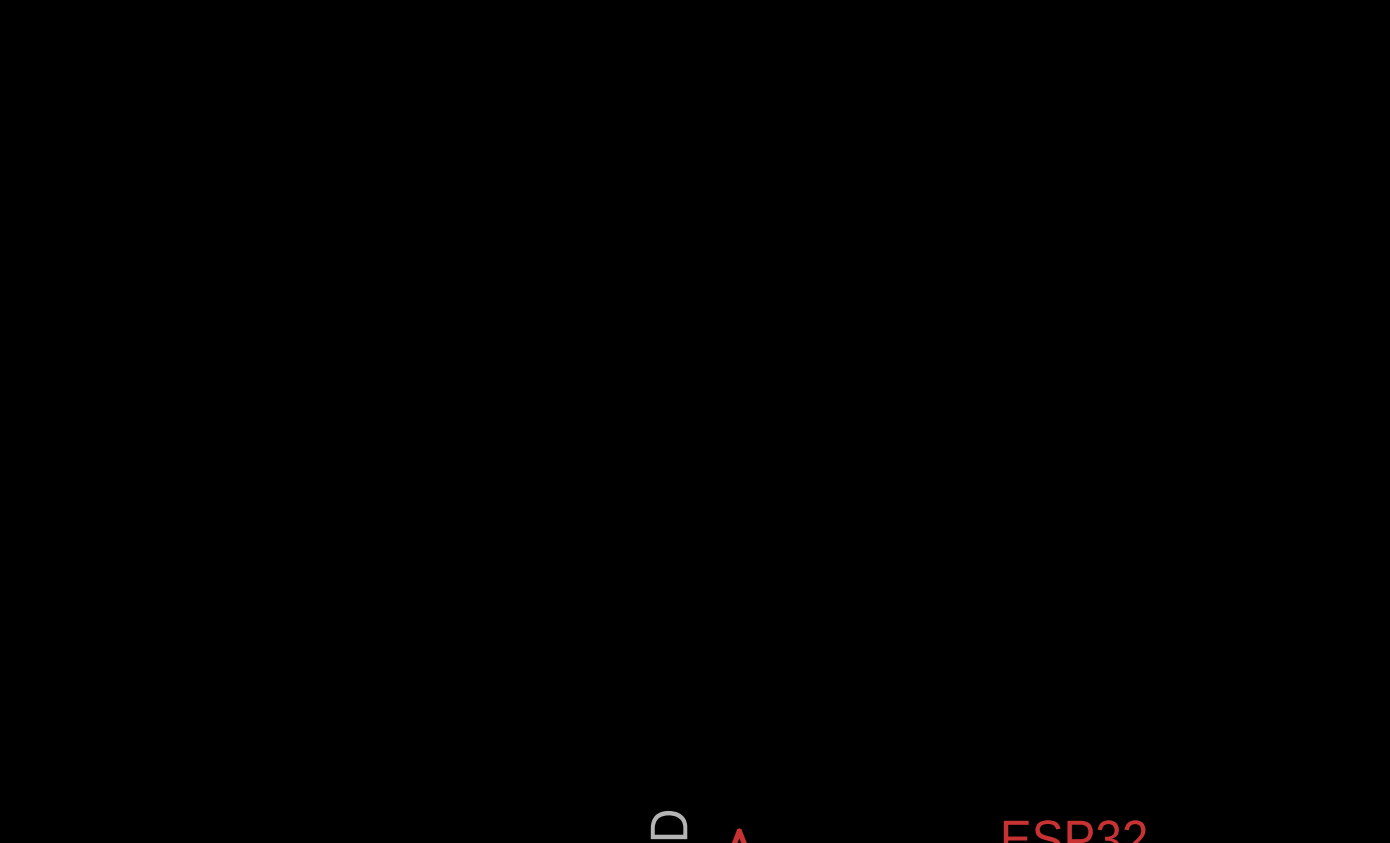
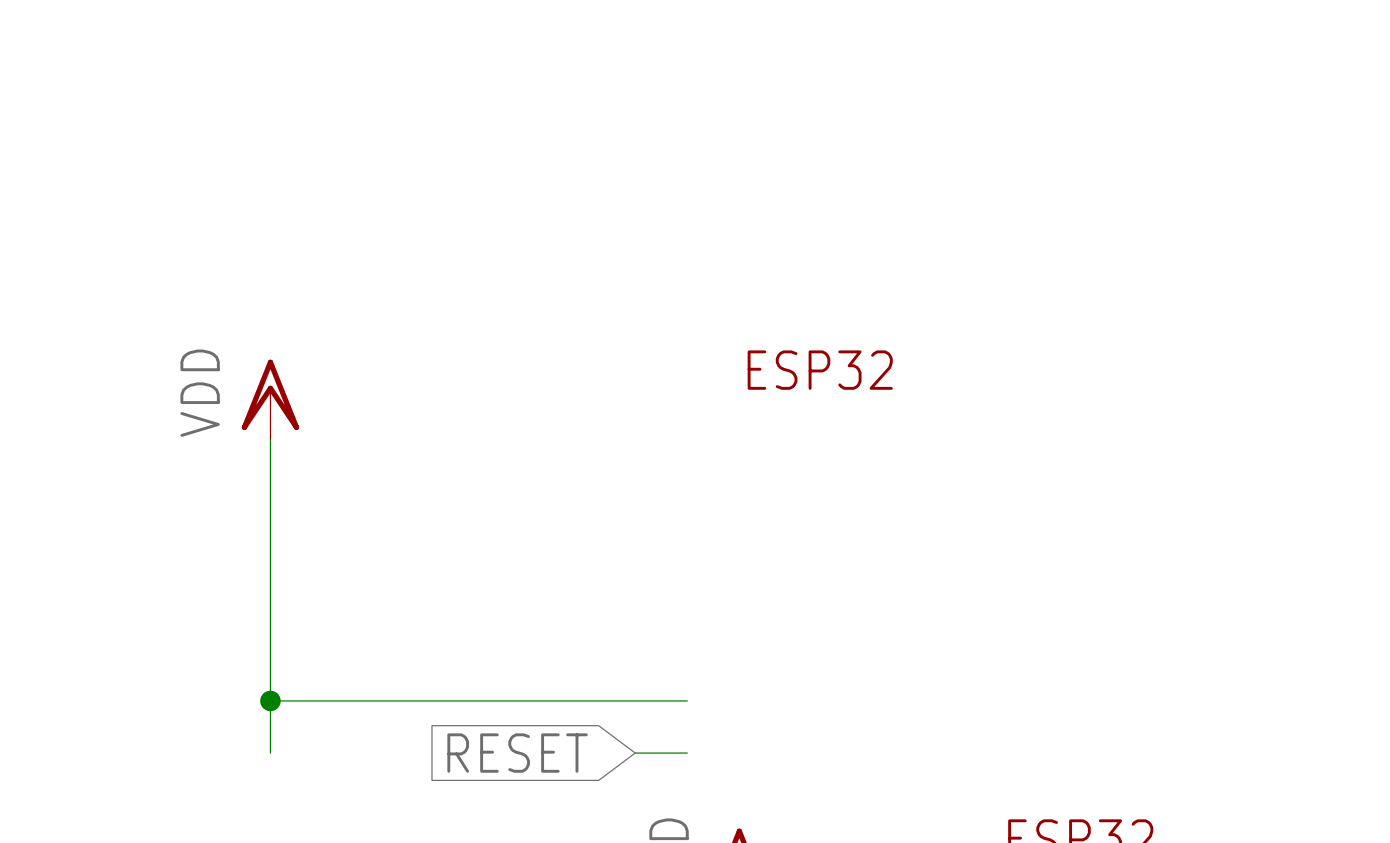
text: none -> ESP32 (820, 370)
power symbol: none -> VDD (270, 400)
wire: none -> (270, 440) (270, 753)
wire: none -> (270, 700) (687, 700)
junction: none -> (270, 700)
global label: none -> RESET (517, 753)
wire: none -> (635, 753) (687, 753)

